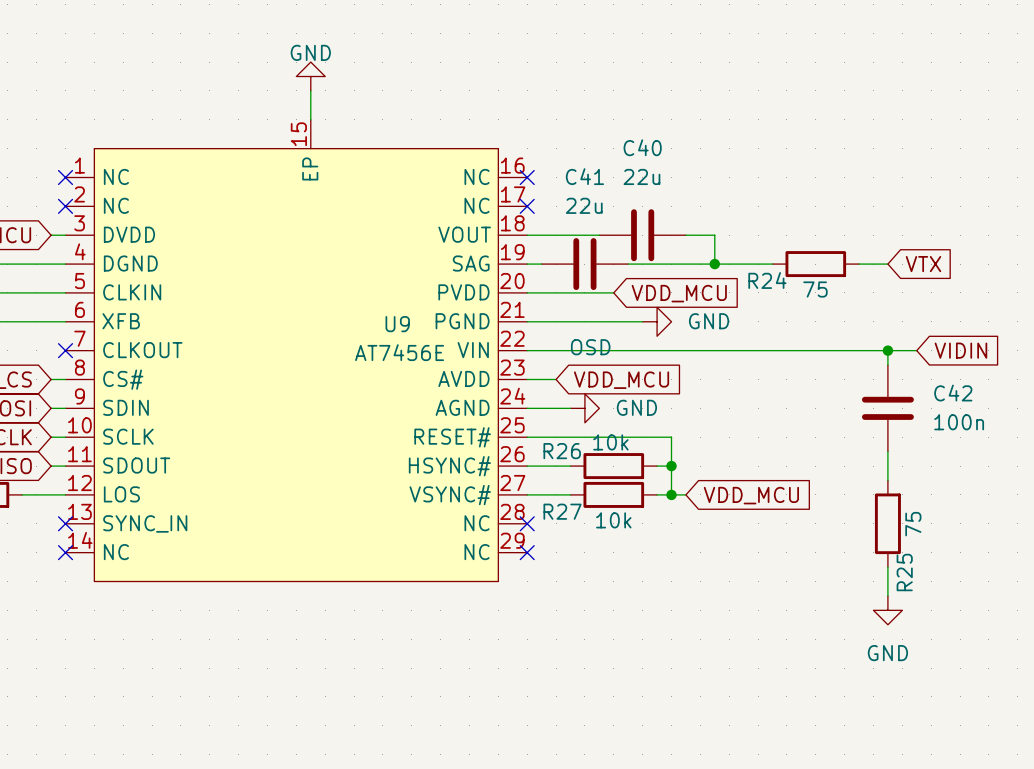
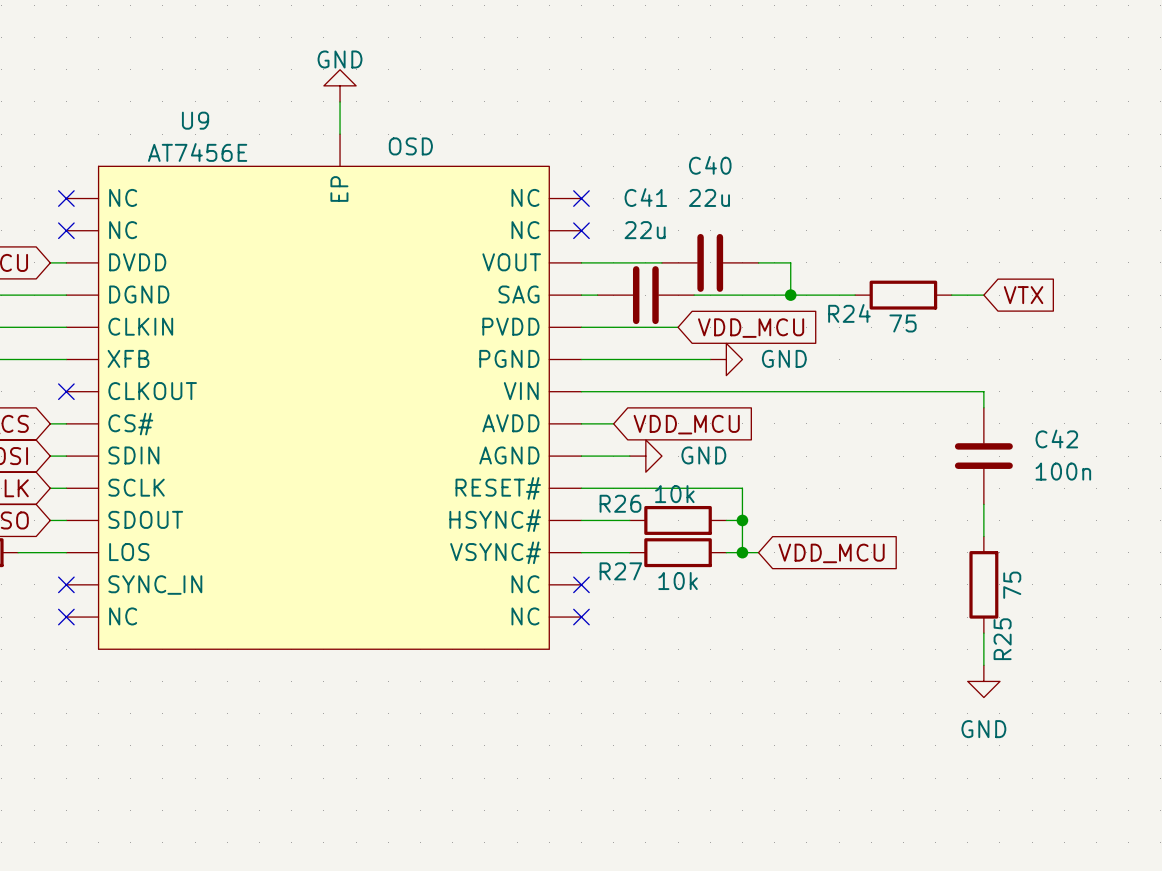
U9 symbol: [65, 119, 528, 582] -> [66, 134, 582, 650]
U9 name position: U9 (397, 324) -> U9 (195, 120)
U9 text position: OSD (590, 347) -> OSD (410, 146)
wire: (887, 350) (916, 350) -> none
junction: (887, 350) -> none
global label: VIDIN (960, 350) -> none
U9 value position: AT7456E (399, 352) -> AT7456E (197, 152)

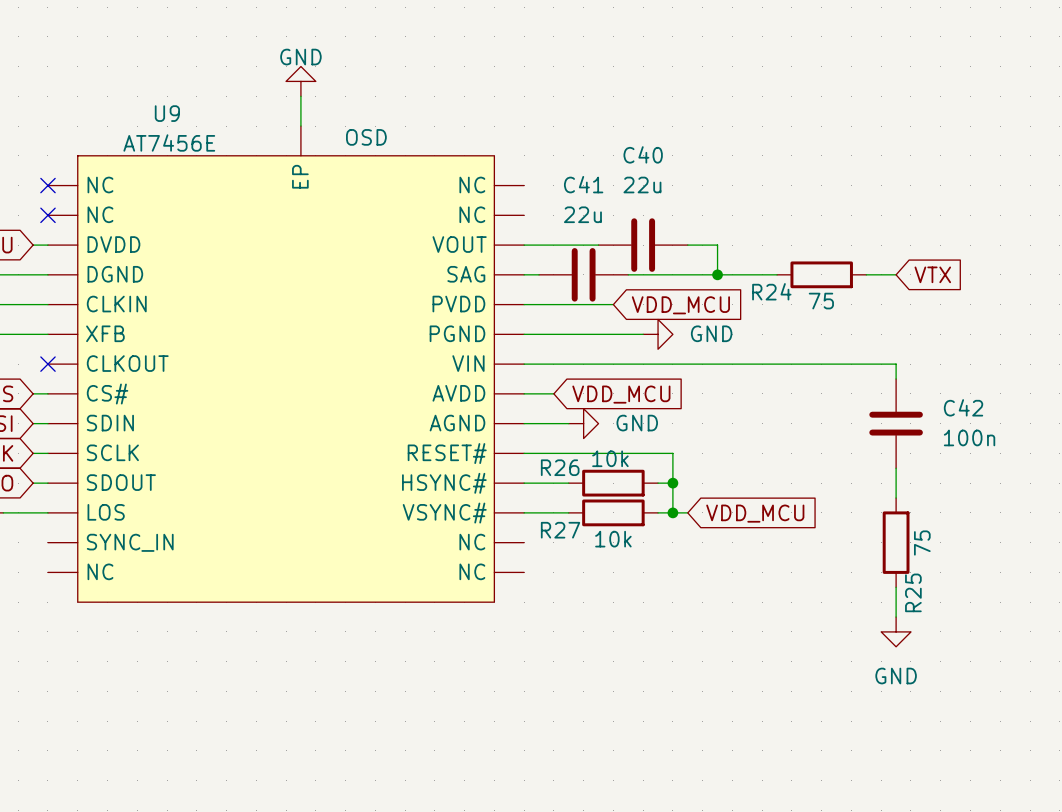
no-connect mark: (581, 198) -> none
no-connect mark: (581, 230) -> none
no-connect mark: (66, 584) -> none
no-connect mark: (581, 584) -> none
no-connect mark: (66, 617) -> none
no-connect mark: (581, 617) -> none

